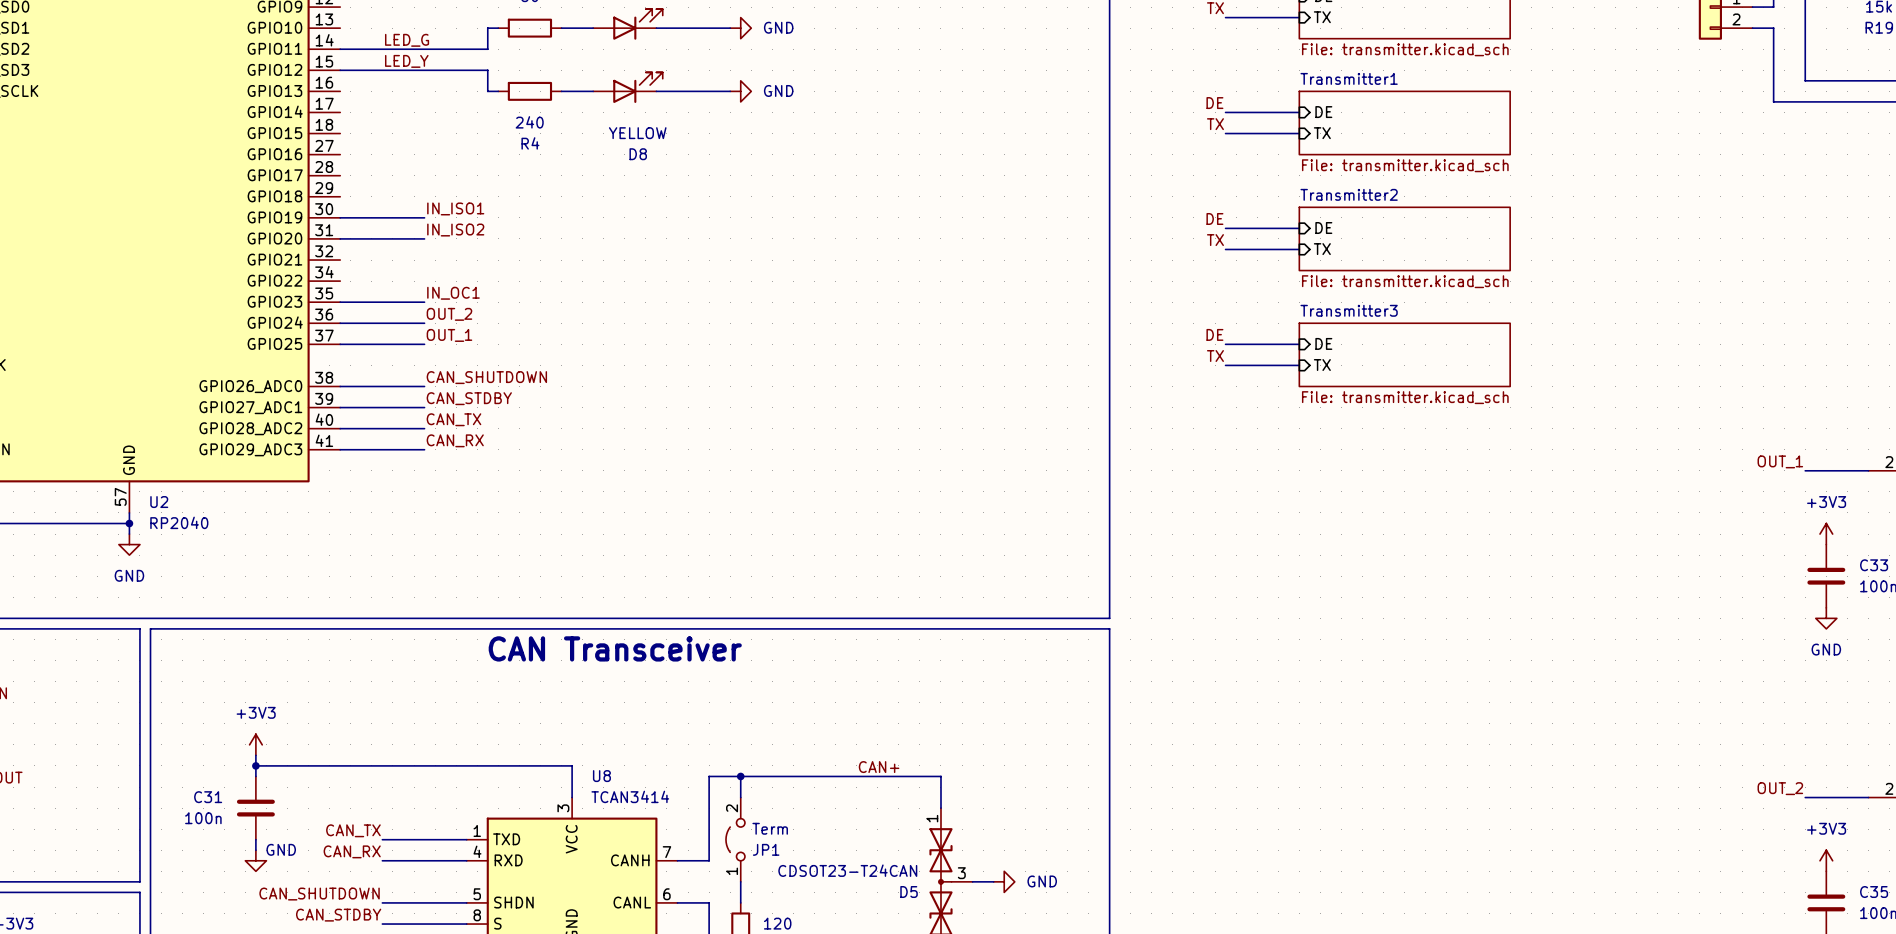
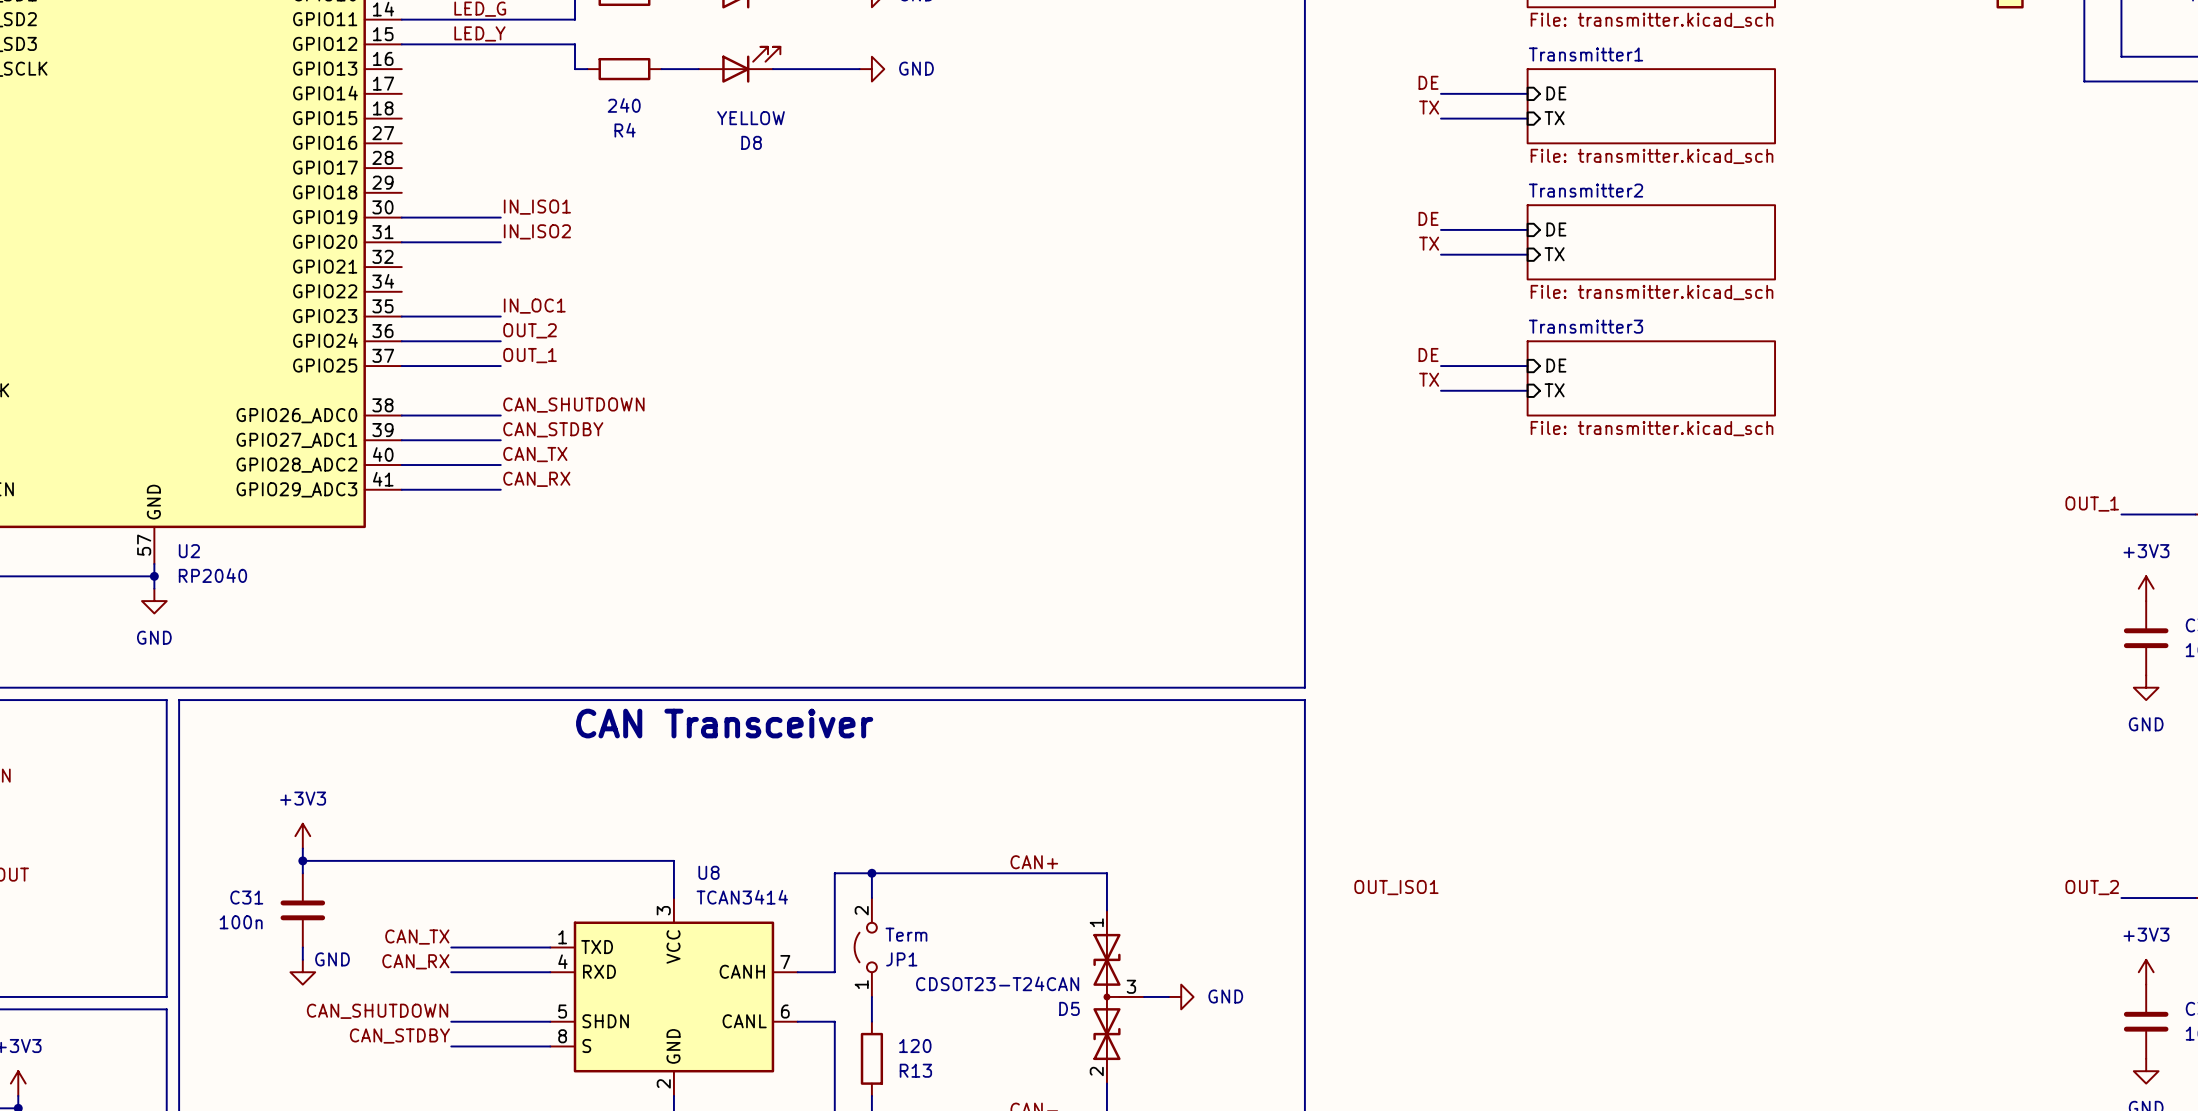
label: none -> OUT_ISO1 (1396, 887)

